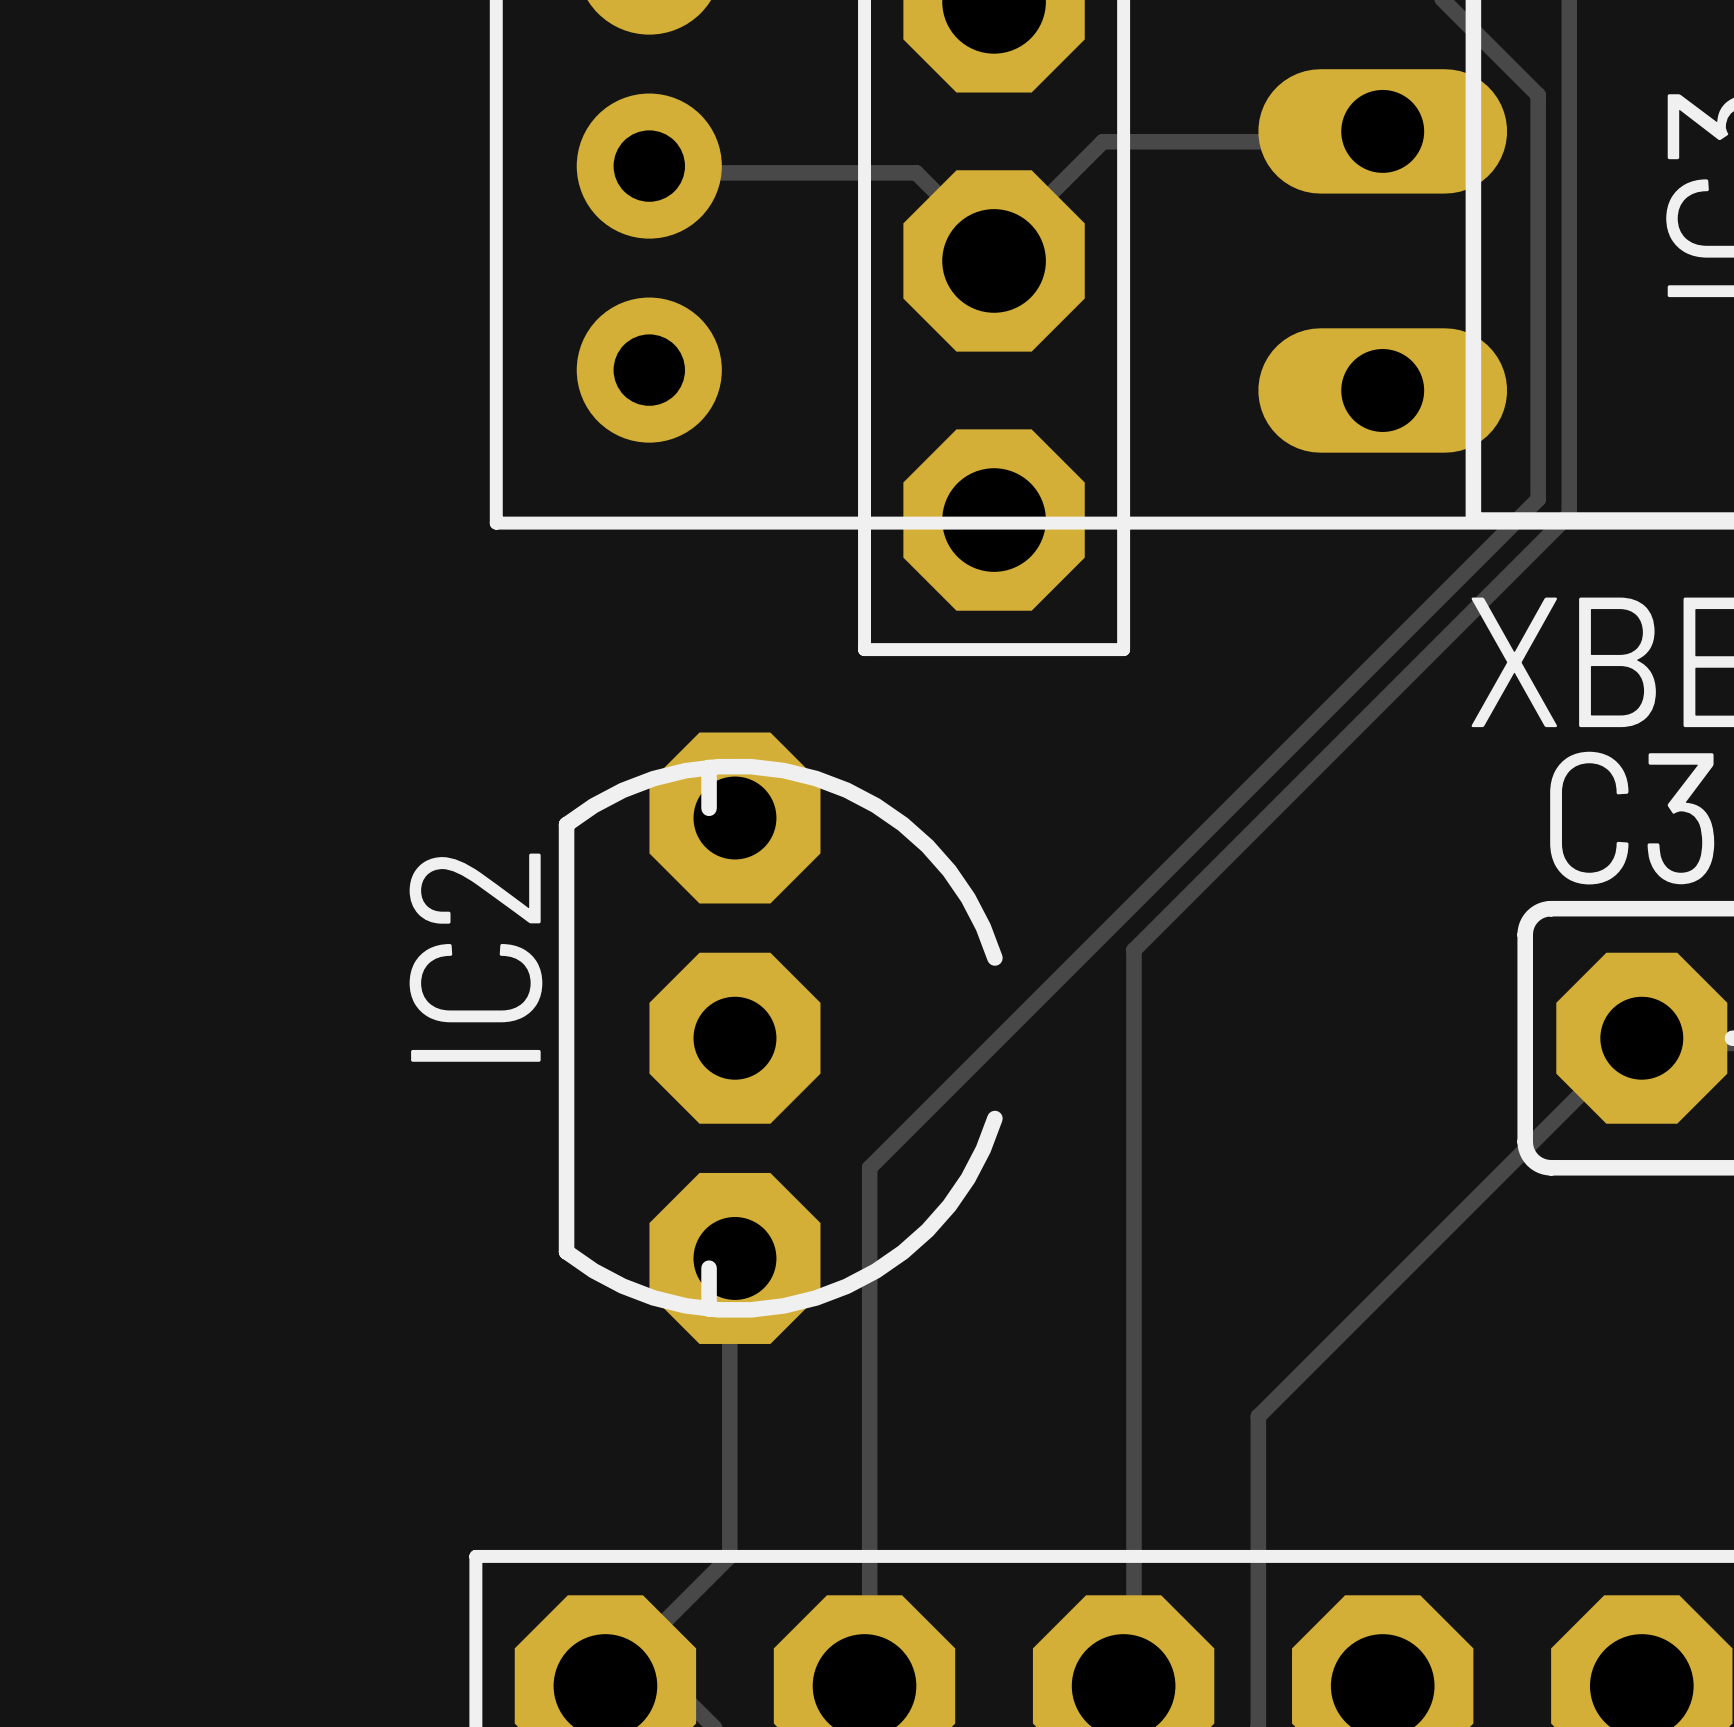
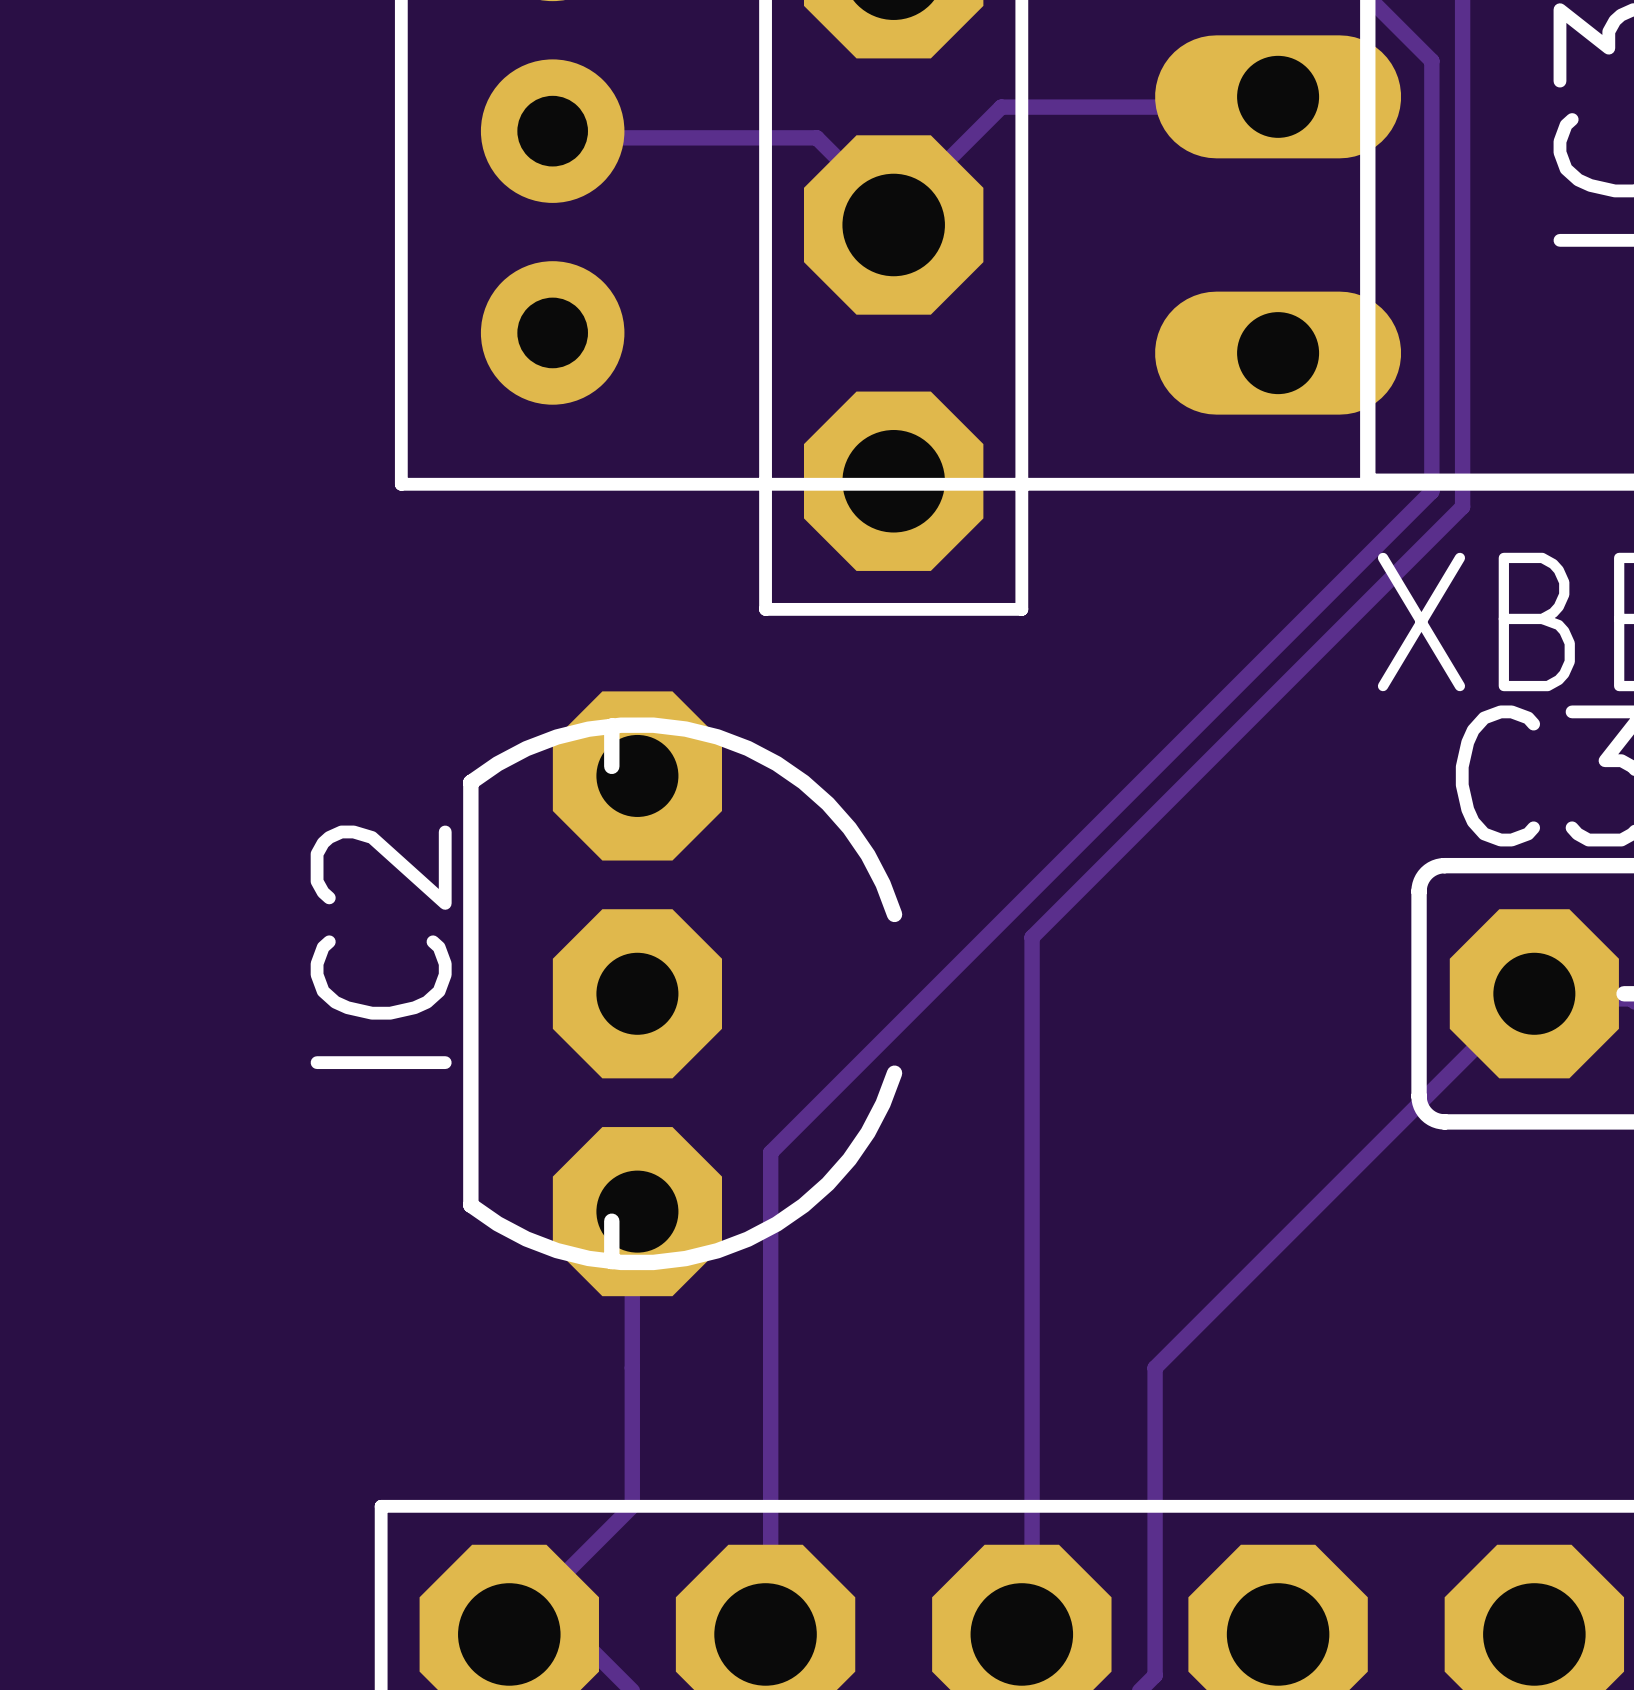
track: (1538, 499) (869, 1167) (869, 1198) -> (1431, 460) (1431, 491) (770, 1152)
track: (1569, 514) (1133, 950) (1133, 981) -> (1462, 476) (1462, 506) (1032, 937)

